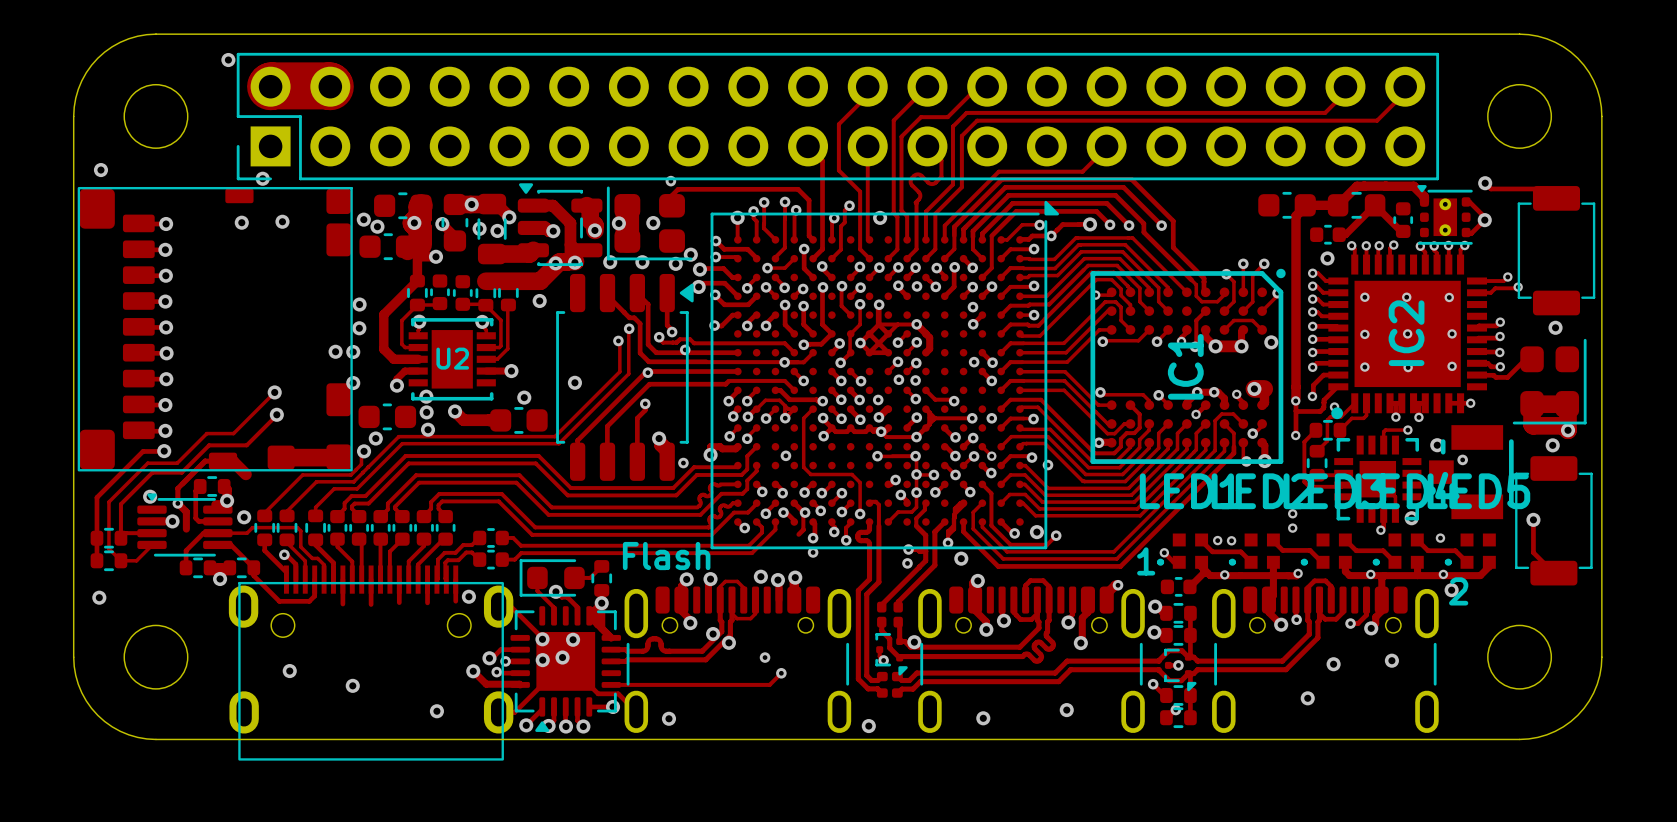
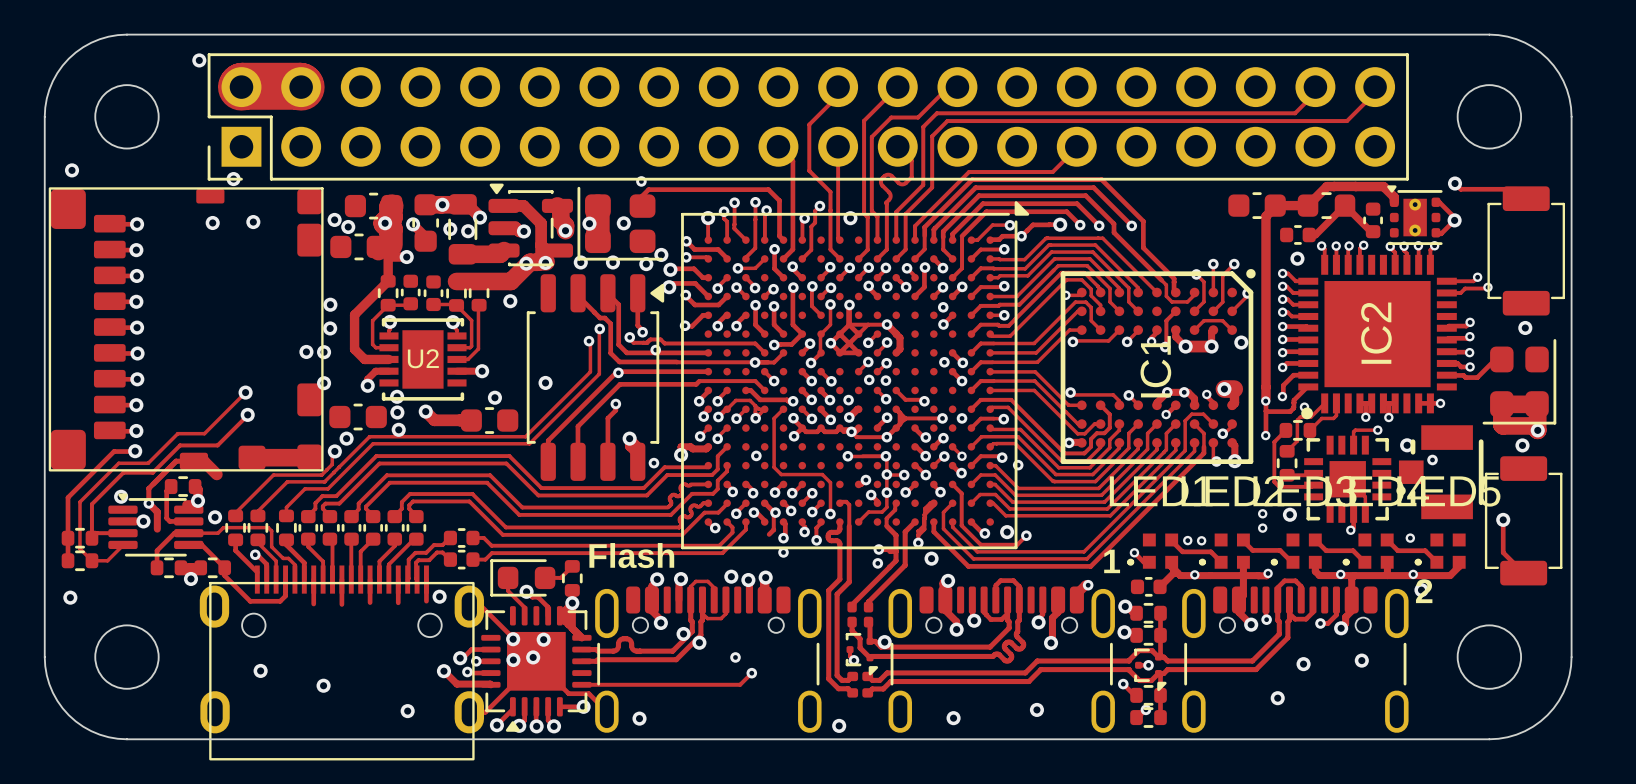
via: (1364, 297) -> none
via: (1406, 297) -> none
via: (1449, 297) -> none
via: (1407, 333) -> none
via: (1452, 333) -> none
via: (1364, 334) -> none
via: (1452, 366) -> none
via: (1364, 367) -> none
via: (1408, 367) -> none
via position: (1411, 518) -> (1289, 514)

